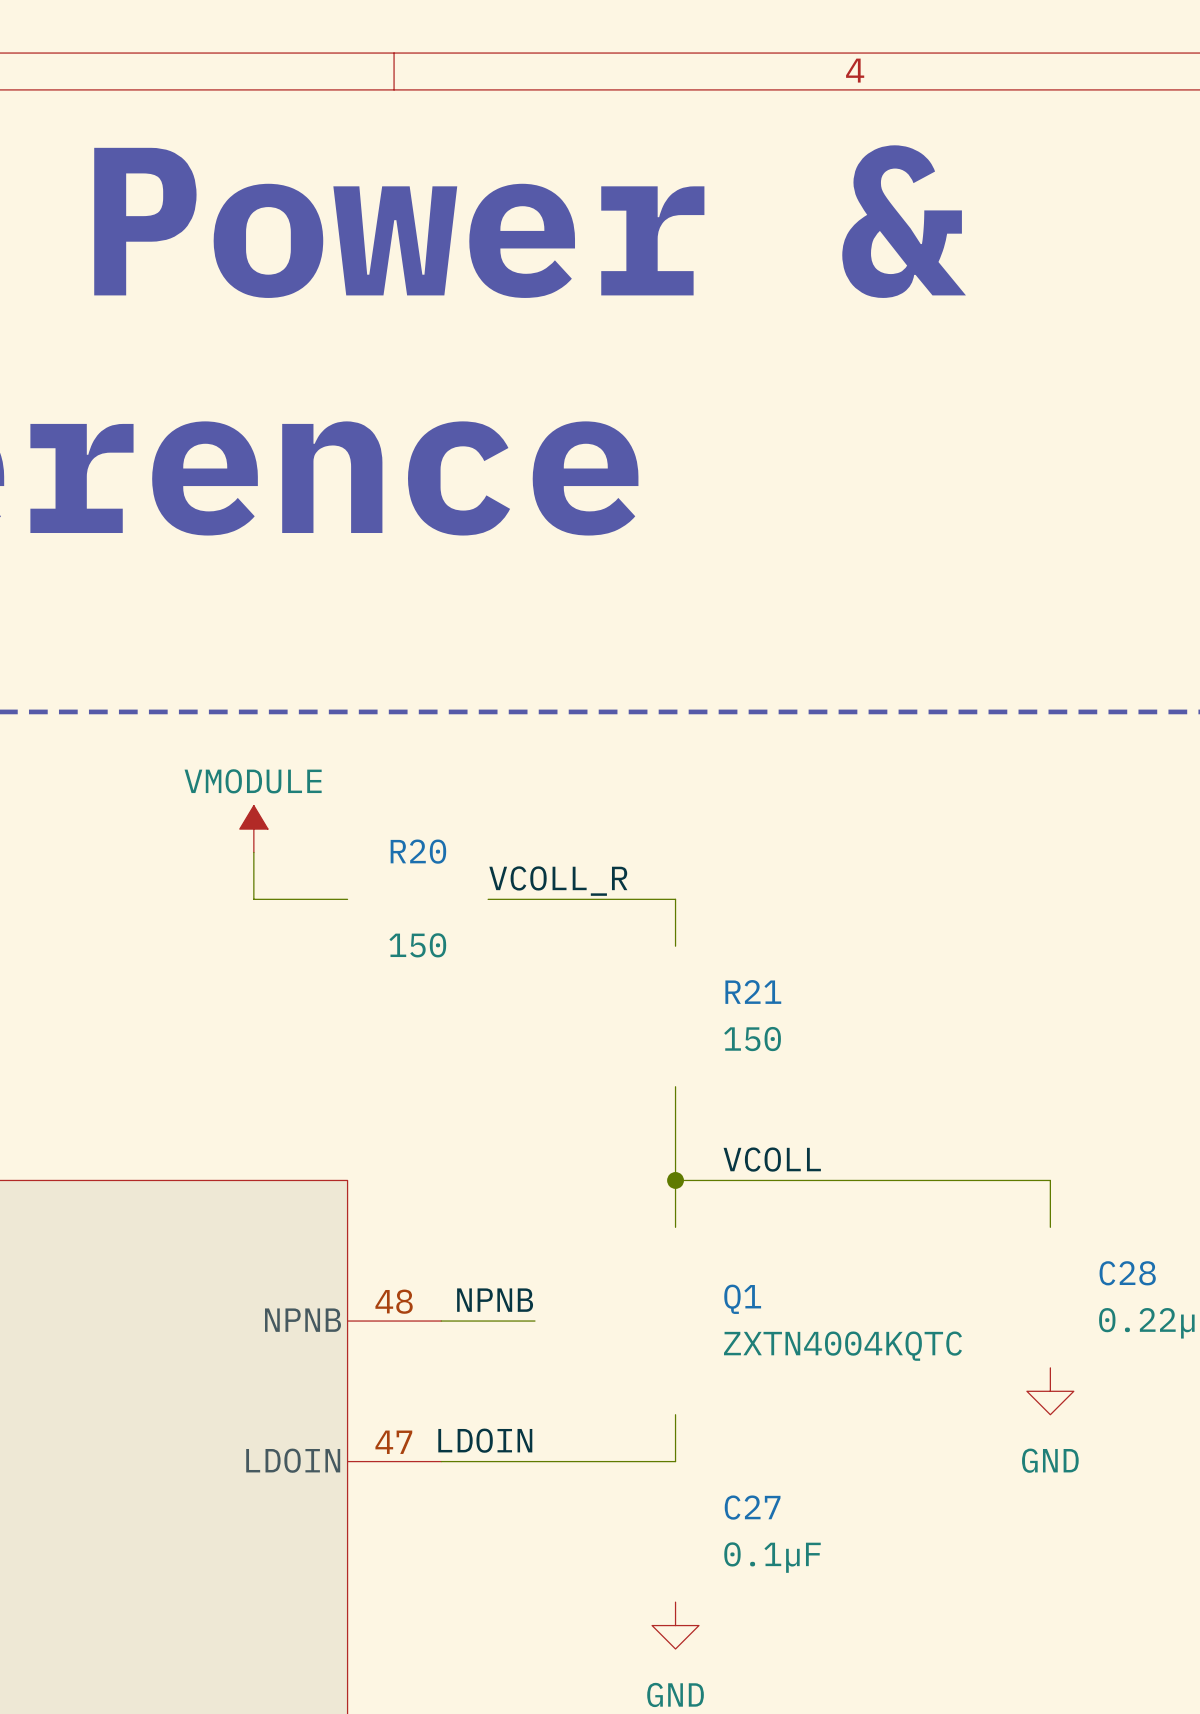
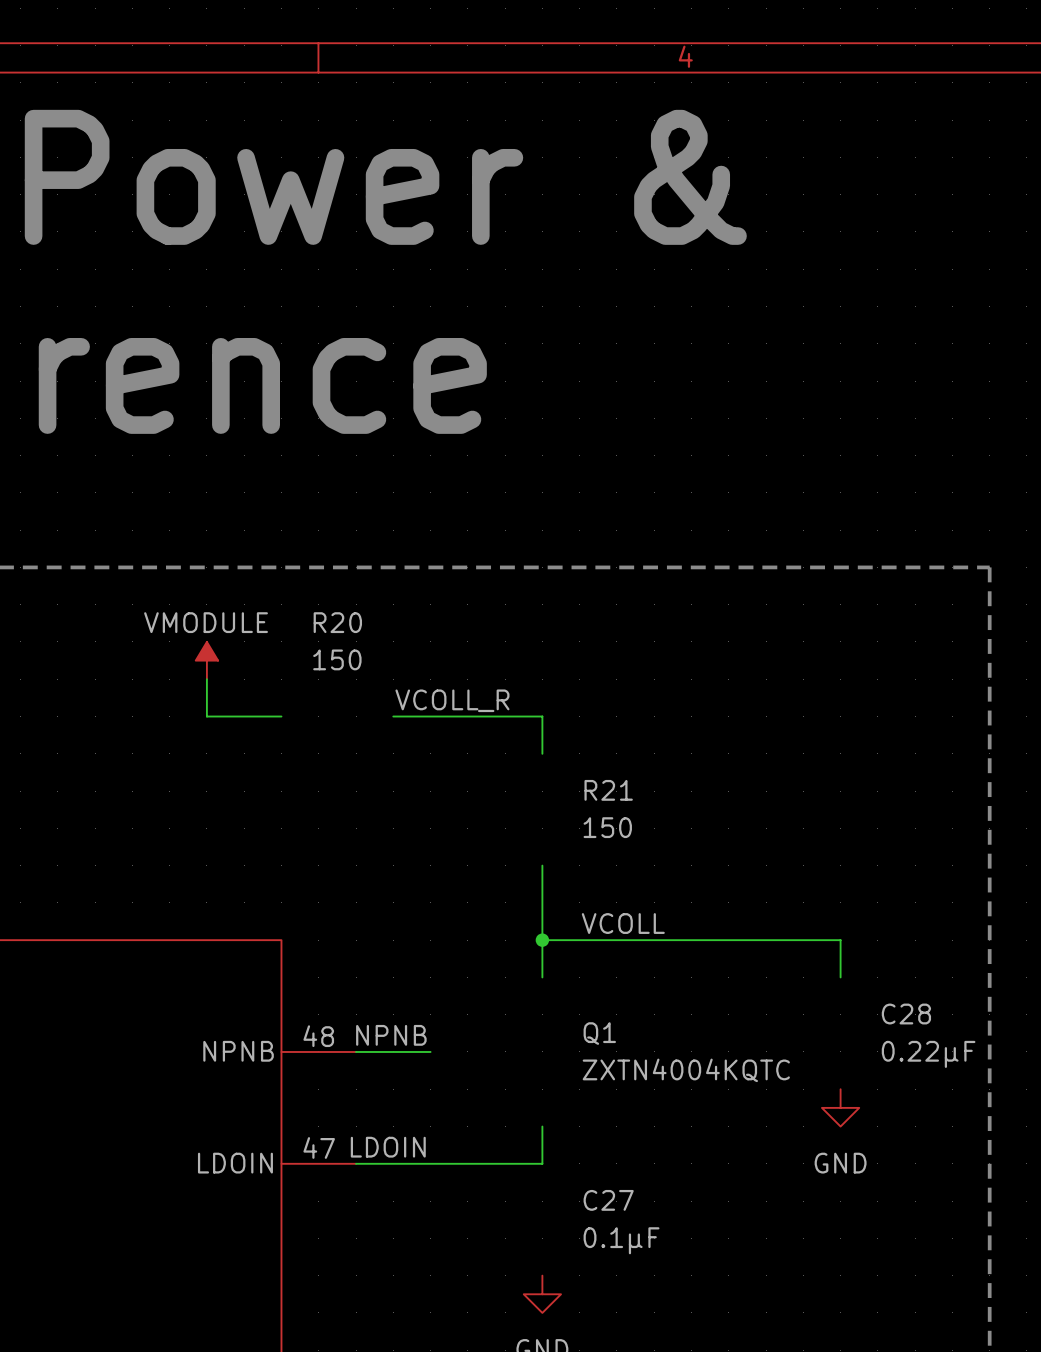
R20 name position: R20 (418, 851) -> R20 (337, 622)
R20 position: (417, 898) -> (337, 641)
R20 value position: 150 (417, 945) -> 150 (337, 659)

